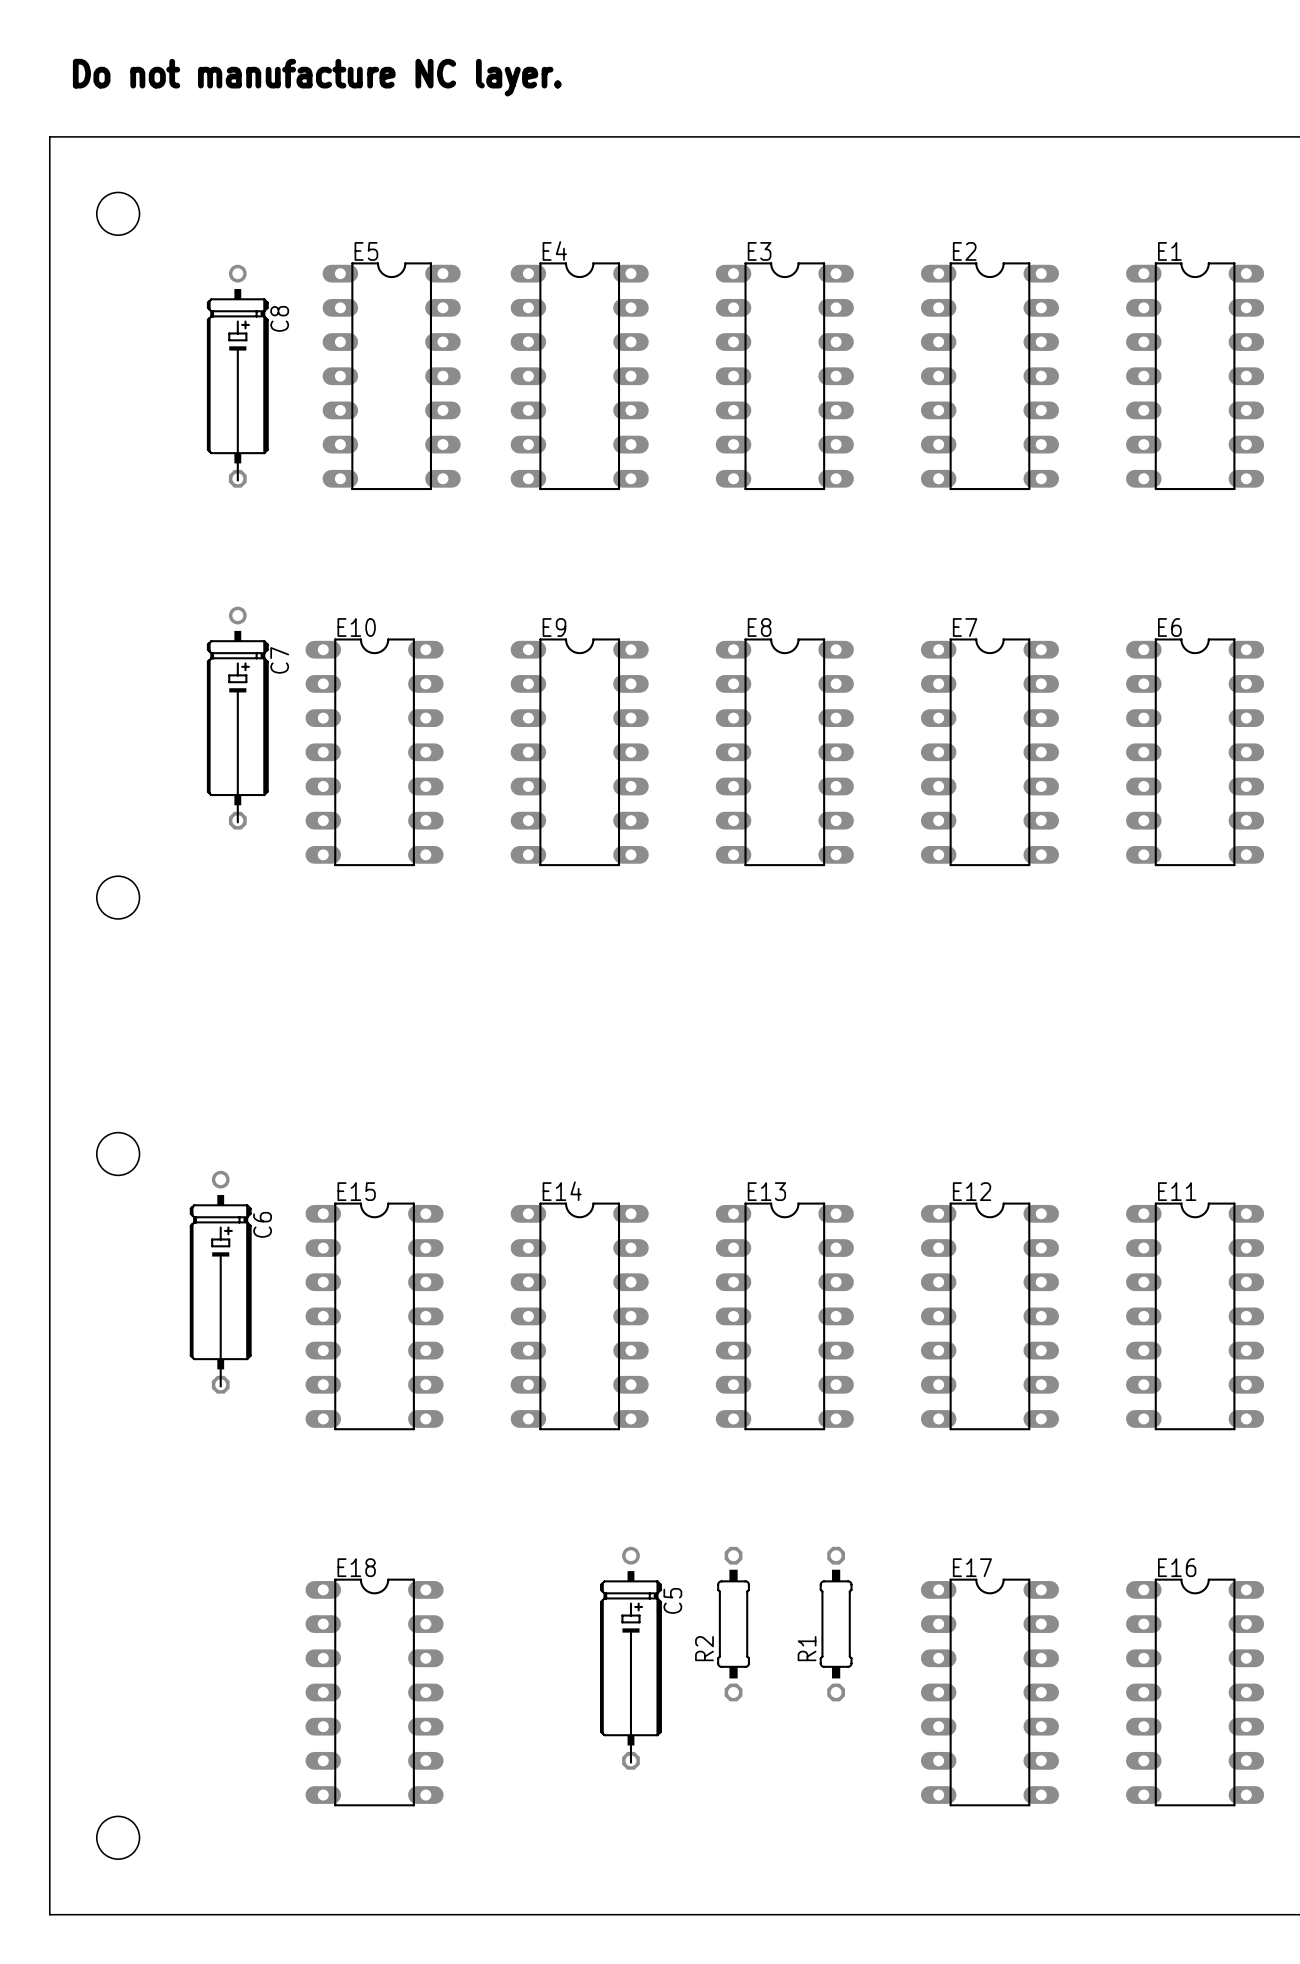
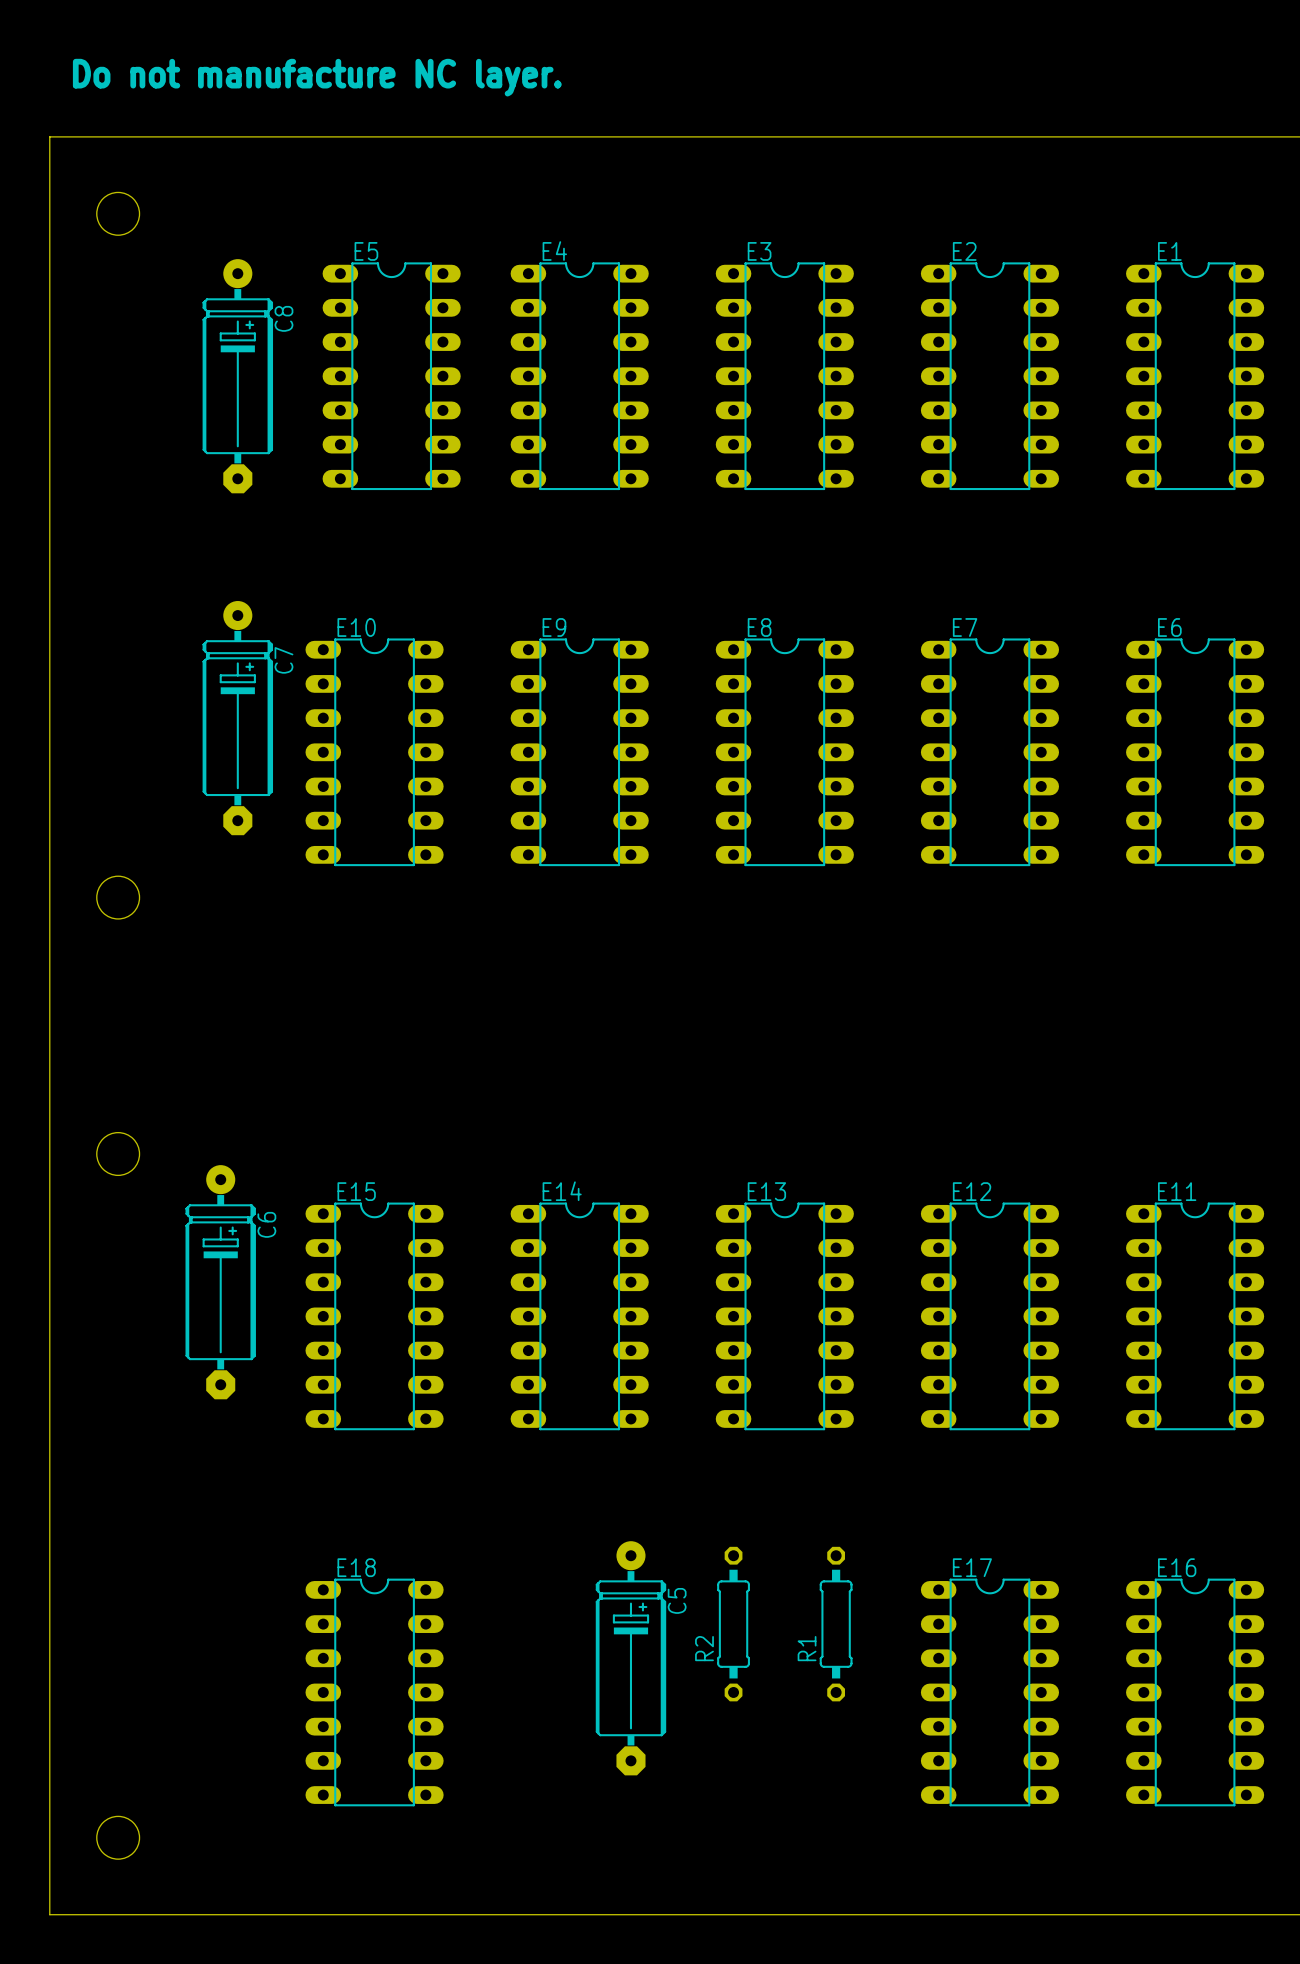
C8 footprint: [206, 264, 269, 488] -> [202, 259, 274, 494]
C7 footprint: [206, 606, 269, 830] -> [202, 601, 274, 836]
C6 footprint: [189, 1170, 252, 1394] -> [185, 1165, 256, 1400]
C5 footprint: [600, 1546, 662, 1770] -> [595, 1541, 667, 1776]

